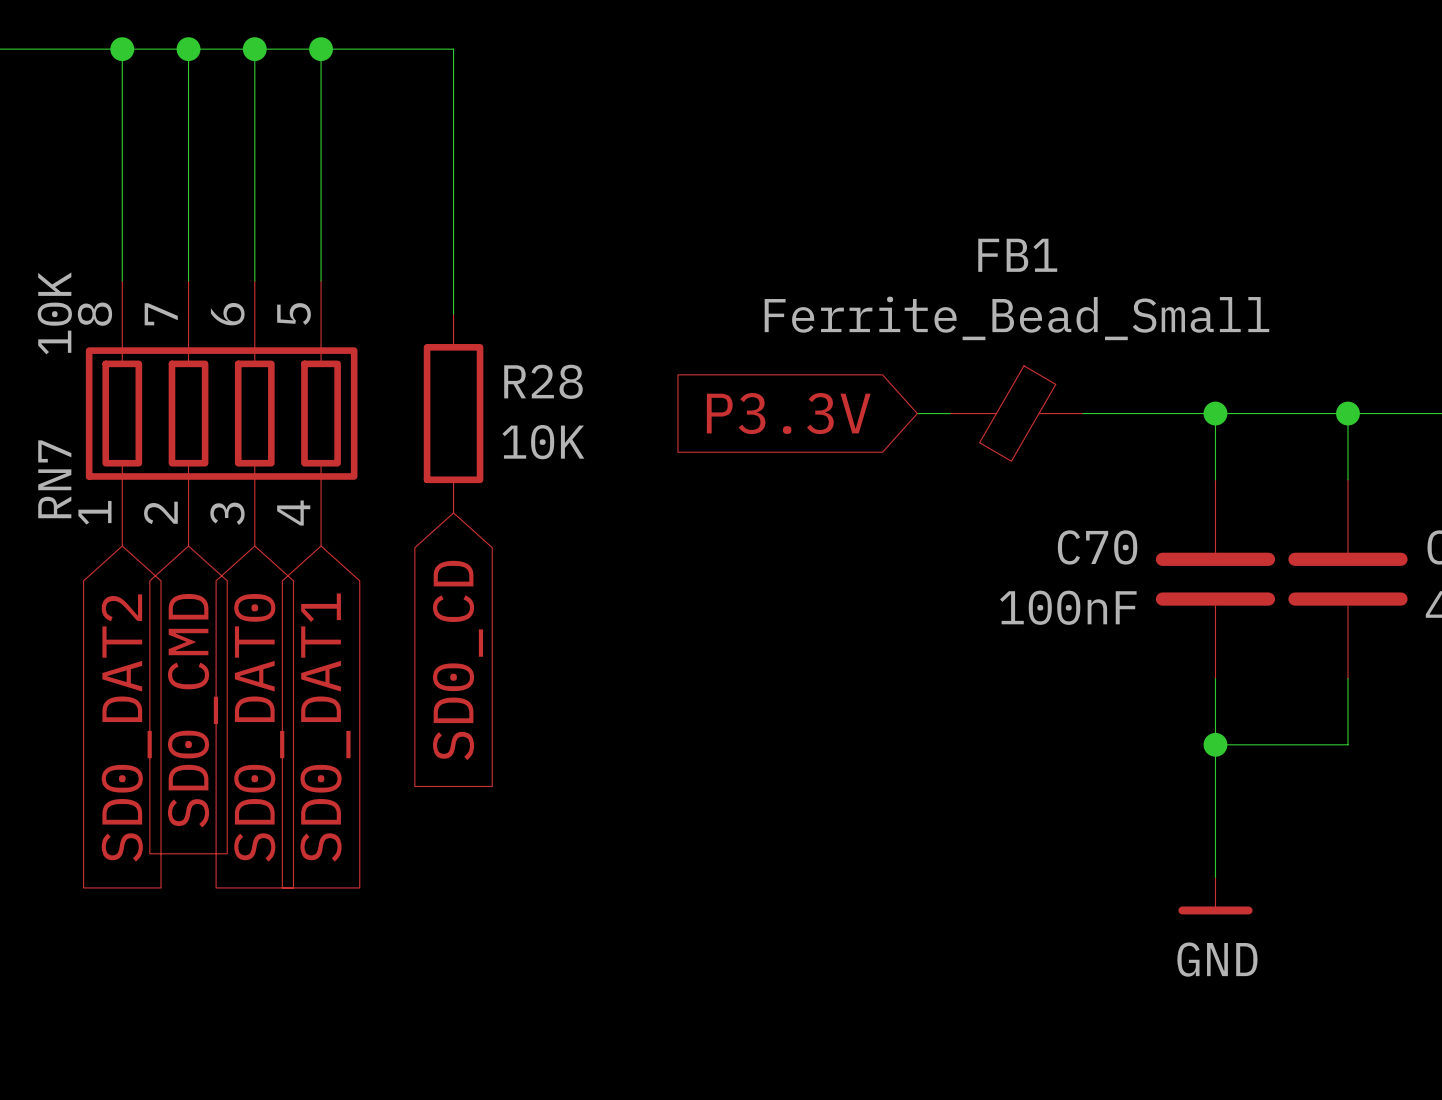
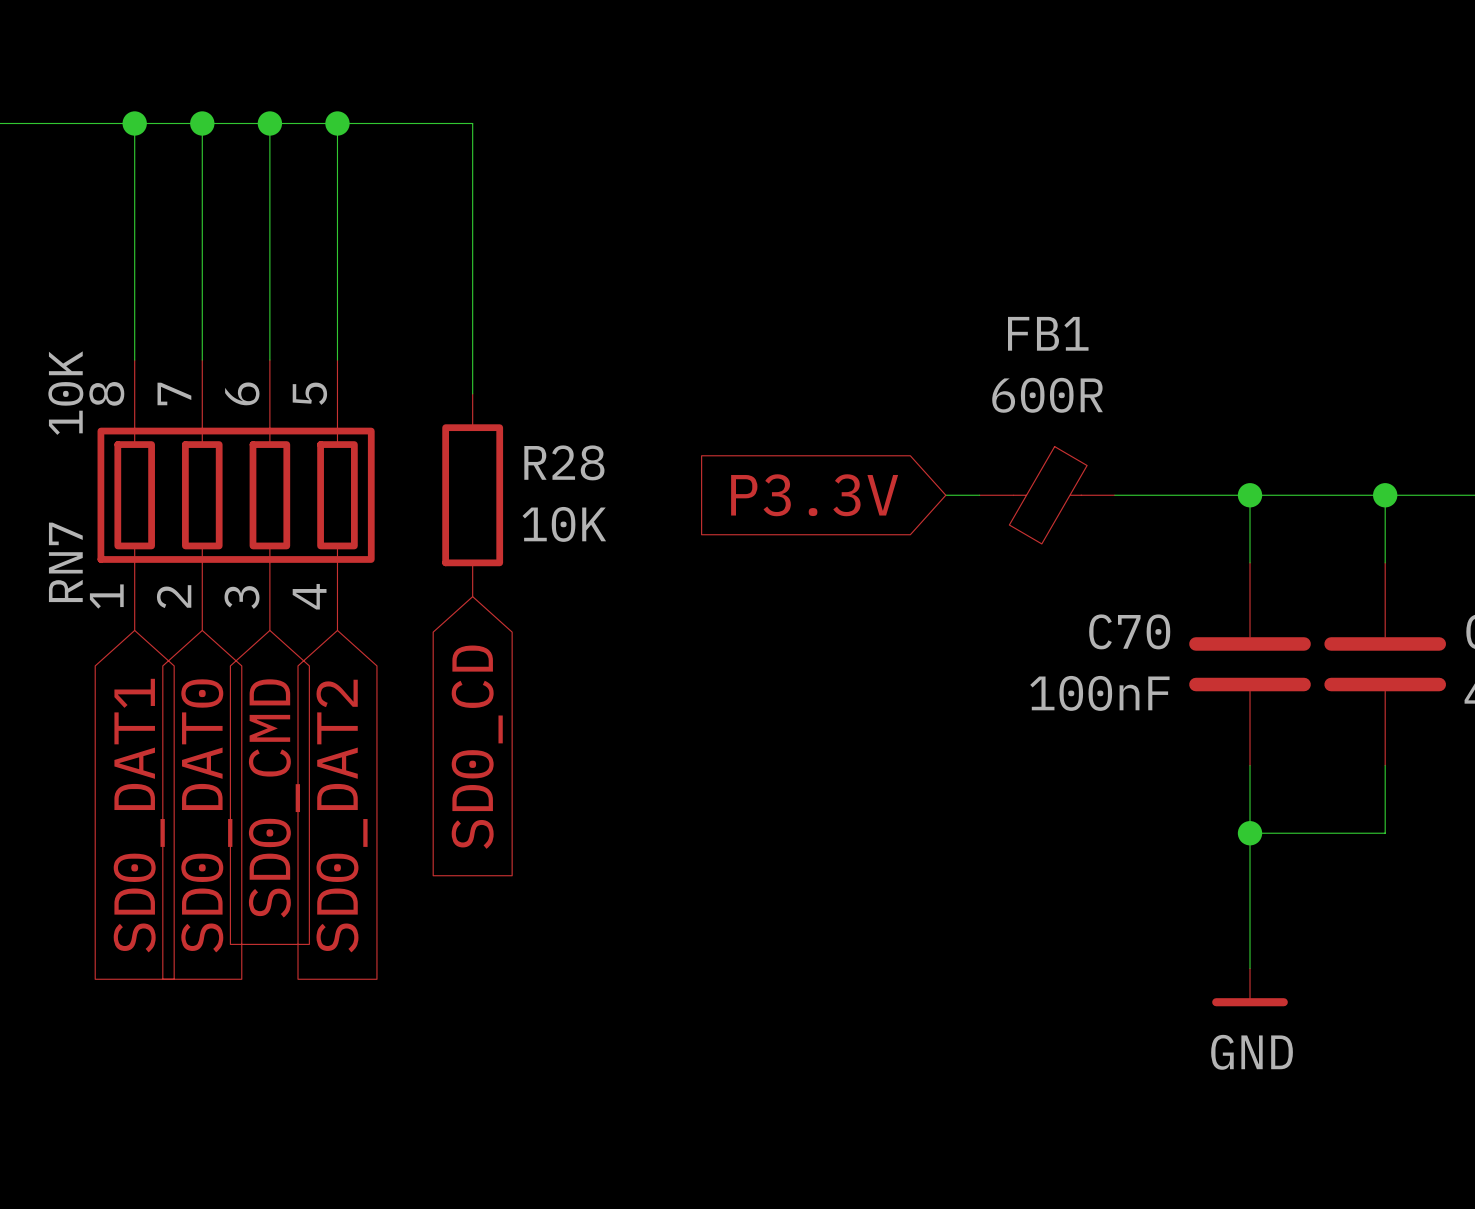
FB1 value: Ferrite_Bead_Small (1016, 318) -> 600R (1047, 395)
global label: SD0_CMD (193, 710) -> SD0_DAT0 (206, 815)
global label: SD0_DAT2 (126, 727) -> SD0_DAT1 (139, 815)
global label: SD0_DAT0 (259, 727) -> SD0_CMD (274, 798)
global label: SD0_DAT1 (325, 727) -> SD0_DAT2 (342, 816)

